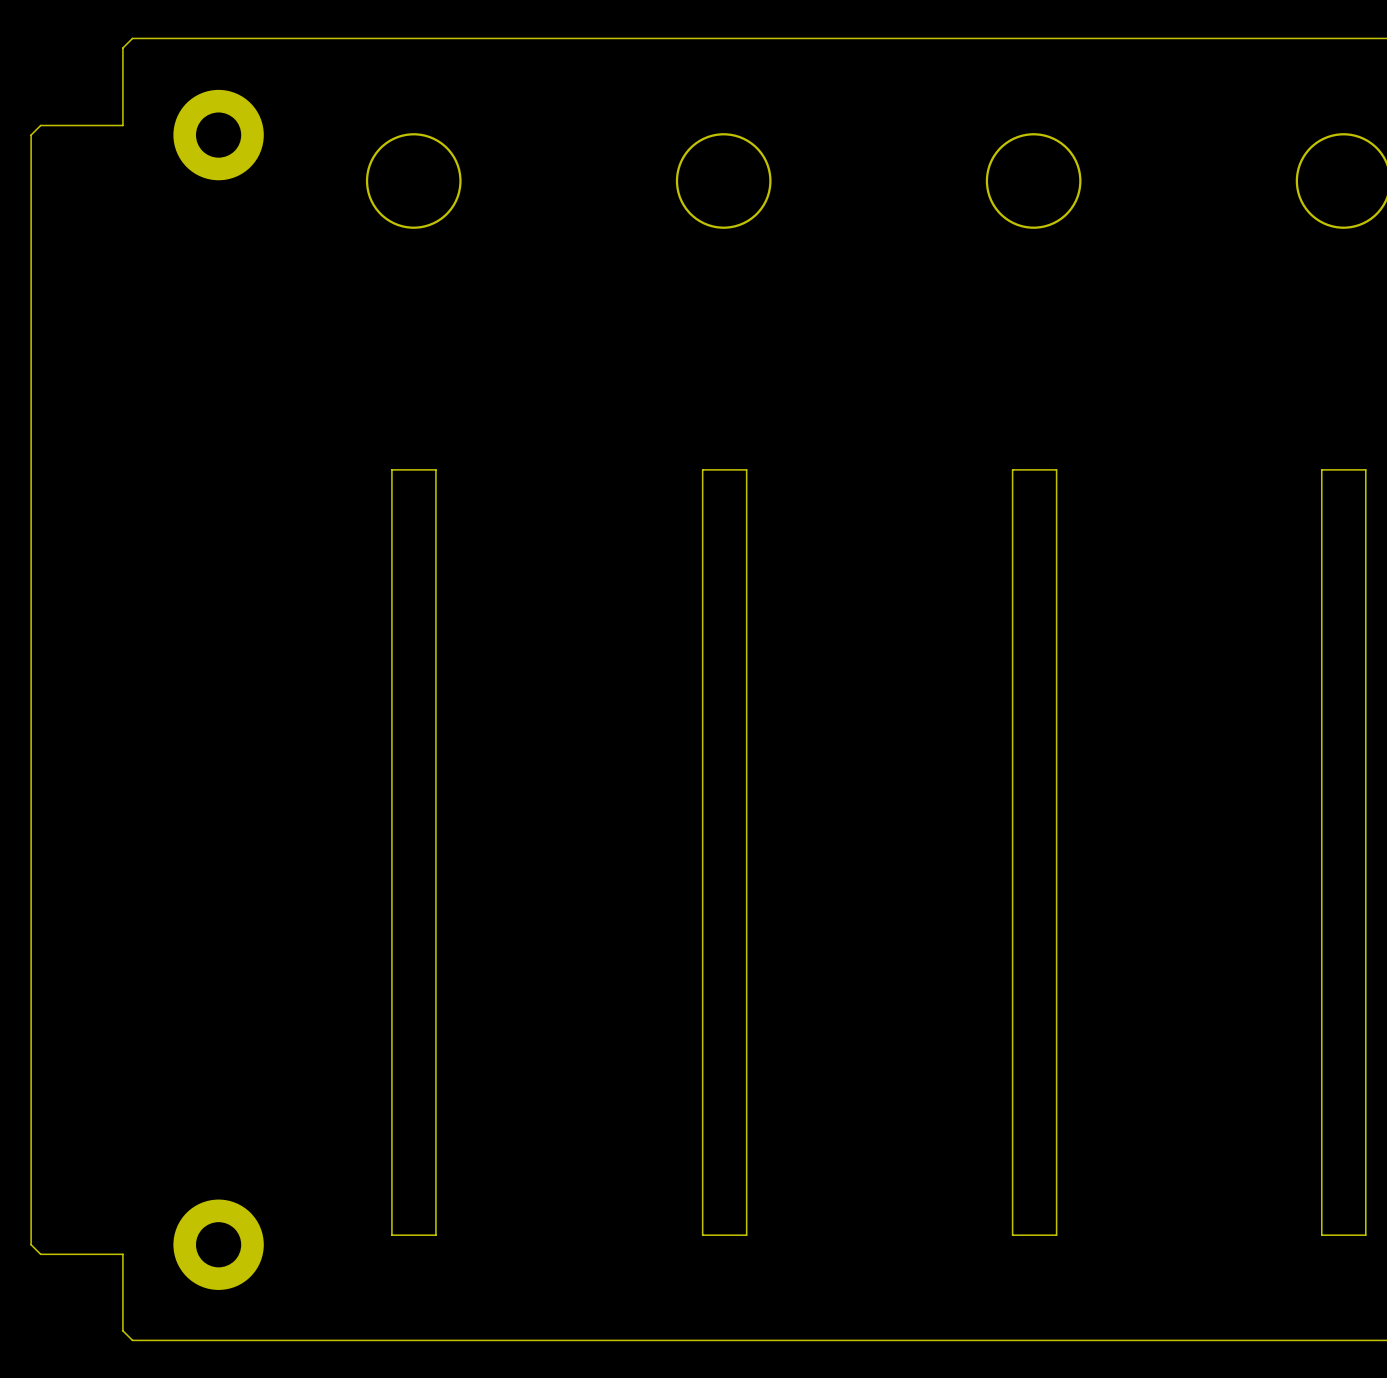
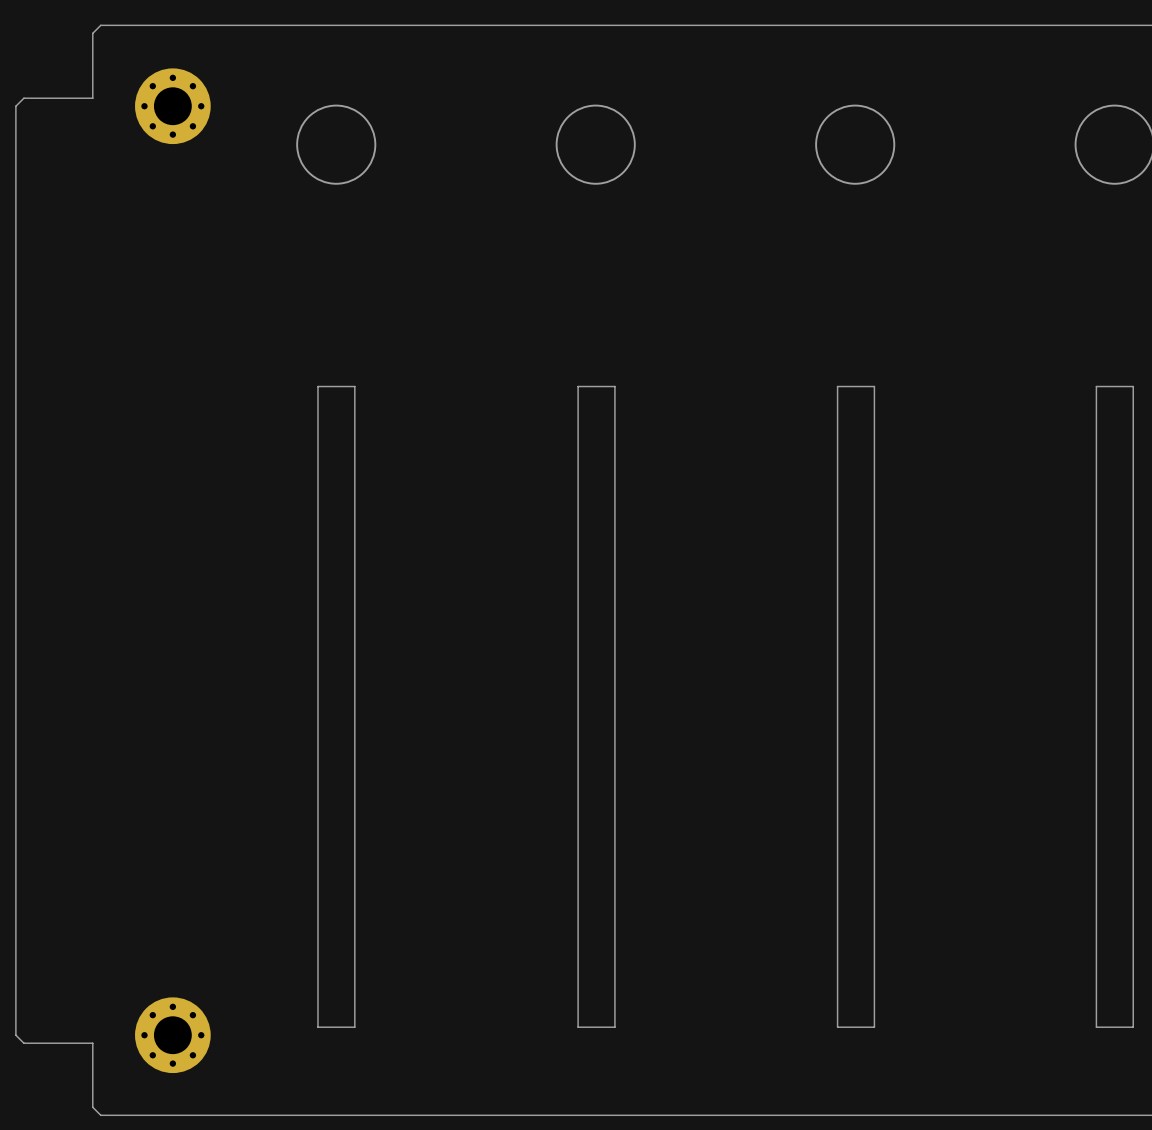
part footprint: [173, 89, 264, 181] -> [135, 68, 211, 145]
part footprint: [173, 1199, 264, 1290] -> [135, 997, 211, 1074]

